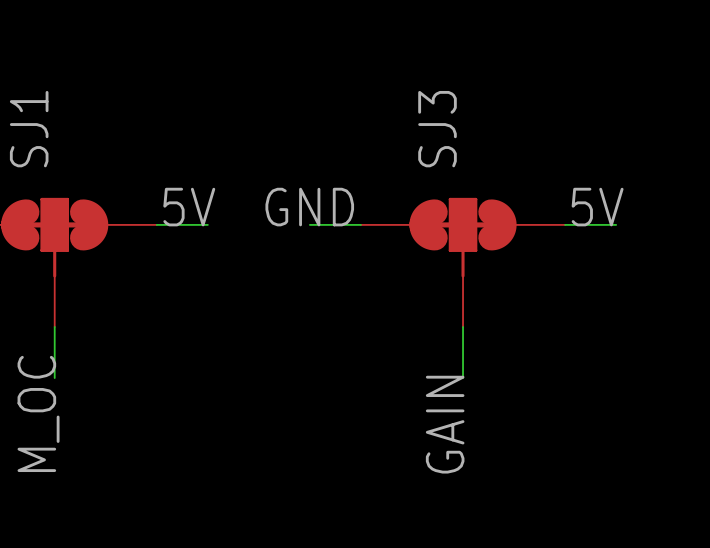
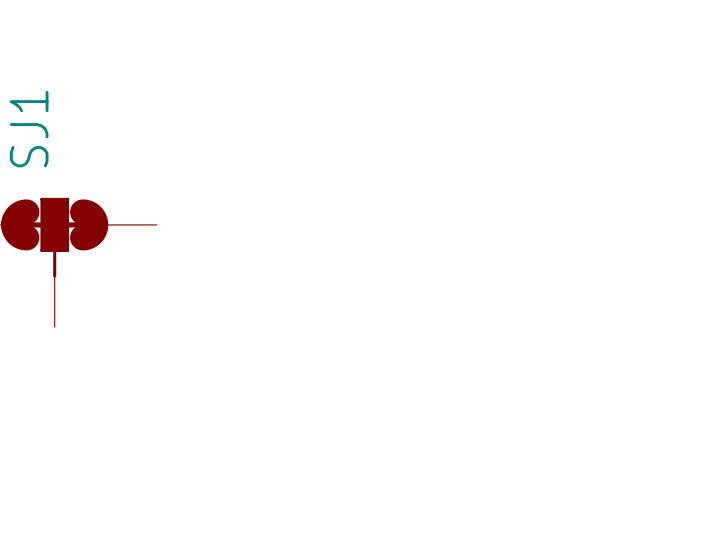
label: 5V (189, 207) -> none
label: GND (309, 207) -> none
label: 5V (597, 207) -> none
wire: (156, 224) (207, 224) -> none
wire: (309, 224) (360, 224) -> none
wire: (565, 224) (616, 224) -> none
SJ3: (463, 262) -> none
wire: (54, 327) (54, 378) -> none
wire: (463, 327) (463, 378) -> none
label: M_OC (38, 413) -> none
label: GAIN (445, 424) -> none

